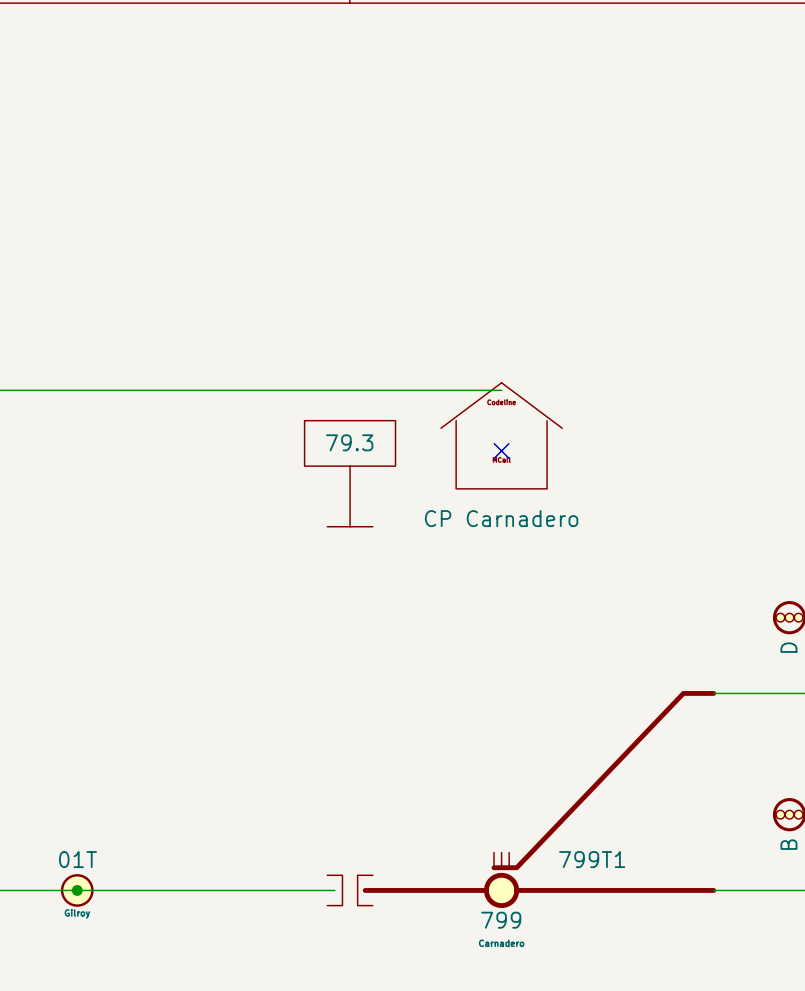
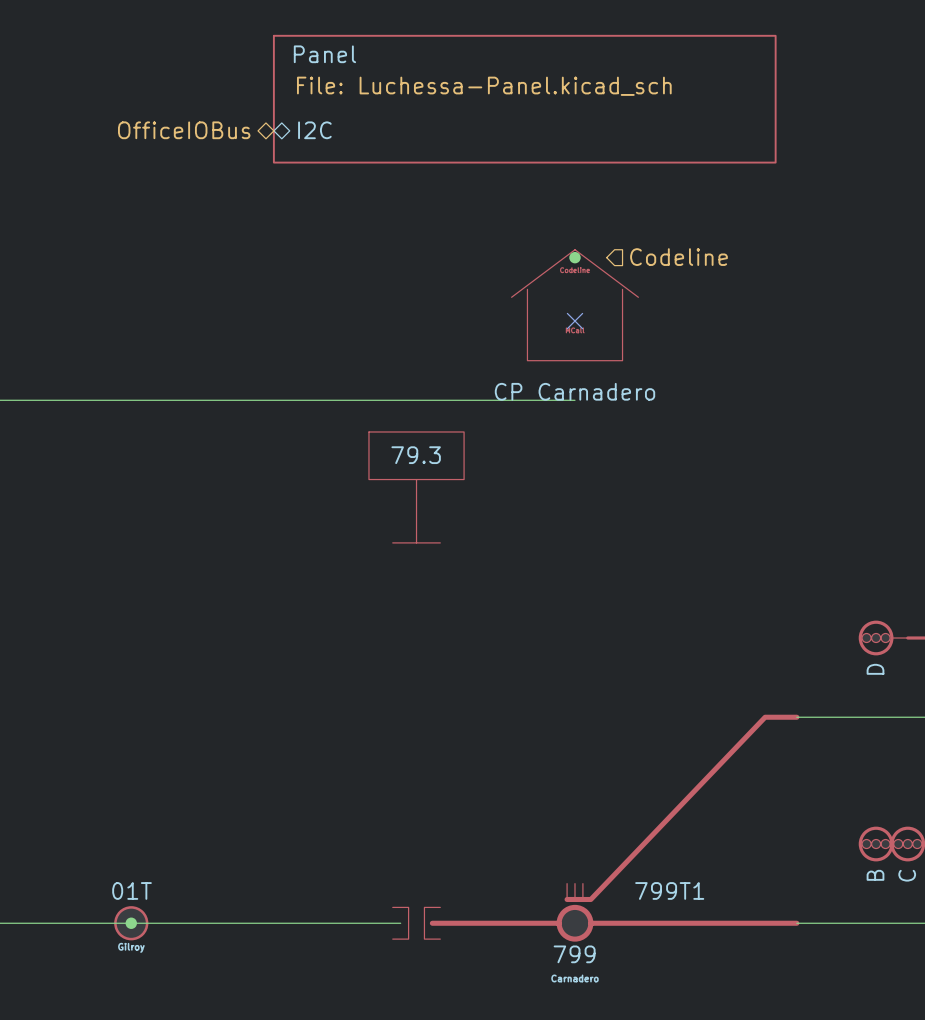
sheet Panel: none -> File: Luchessa-Panel.kicad_sch (524, 99)
hierarchical label: none -> OfficeIOBus (184, 130)
sheet pin: none -> I2C (314, 130)
junction: none -> (574, 257)
hierarchical label: none -> Codeline (679, 257)
no-connect mark: none -> (574, 321)
part position: (501, 435) -> (574, 305)
no-connect mark: (501, 450) -> none

